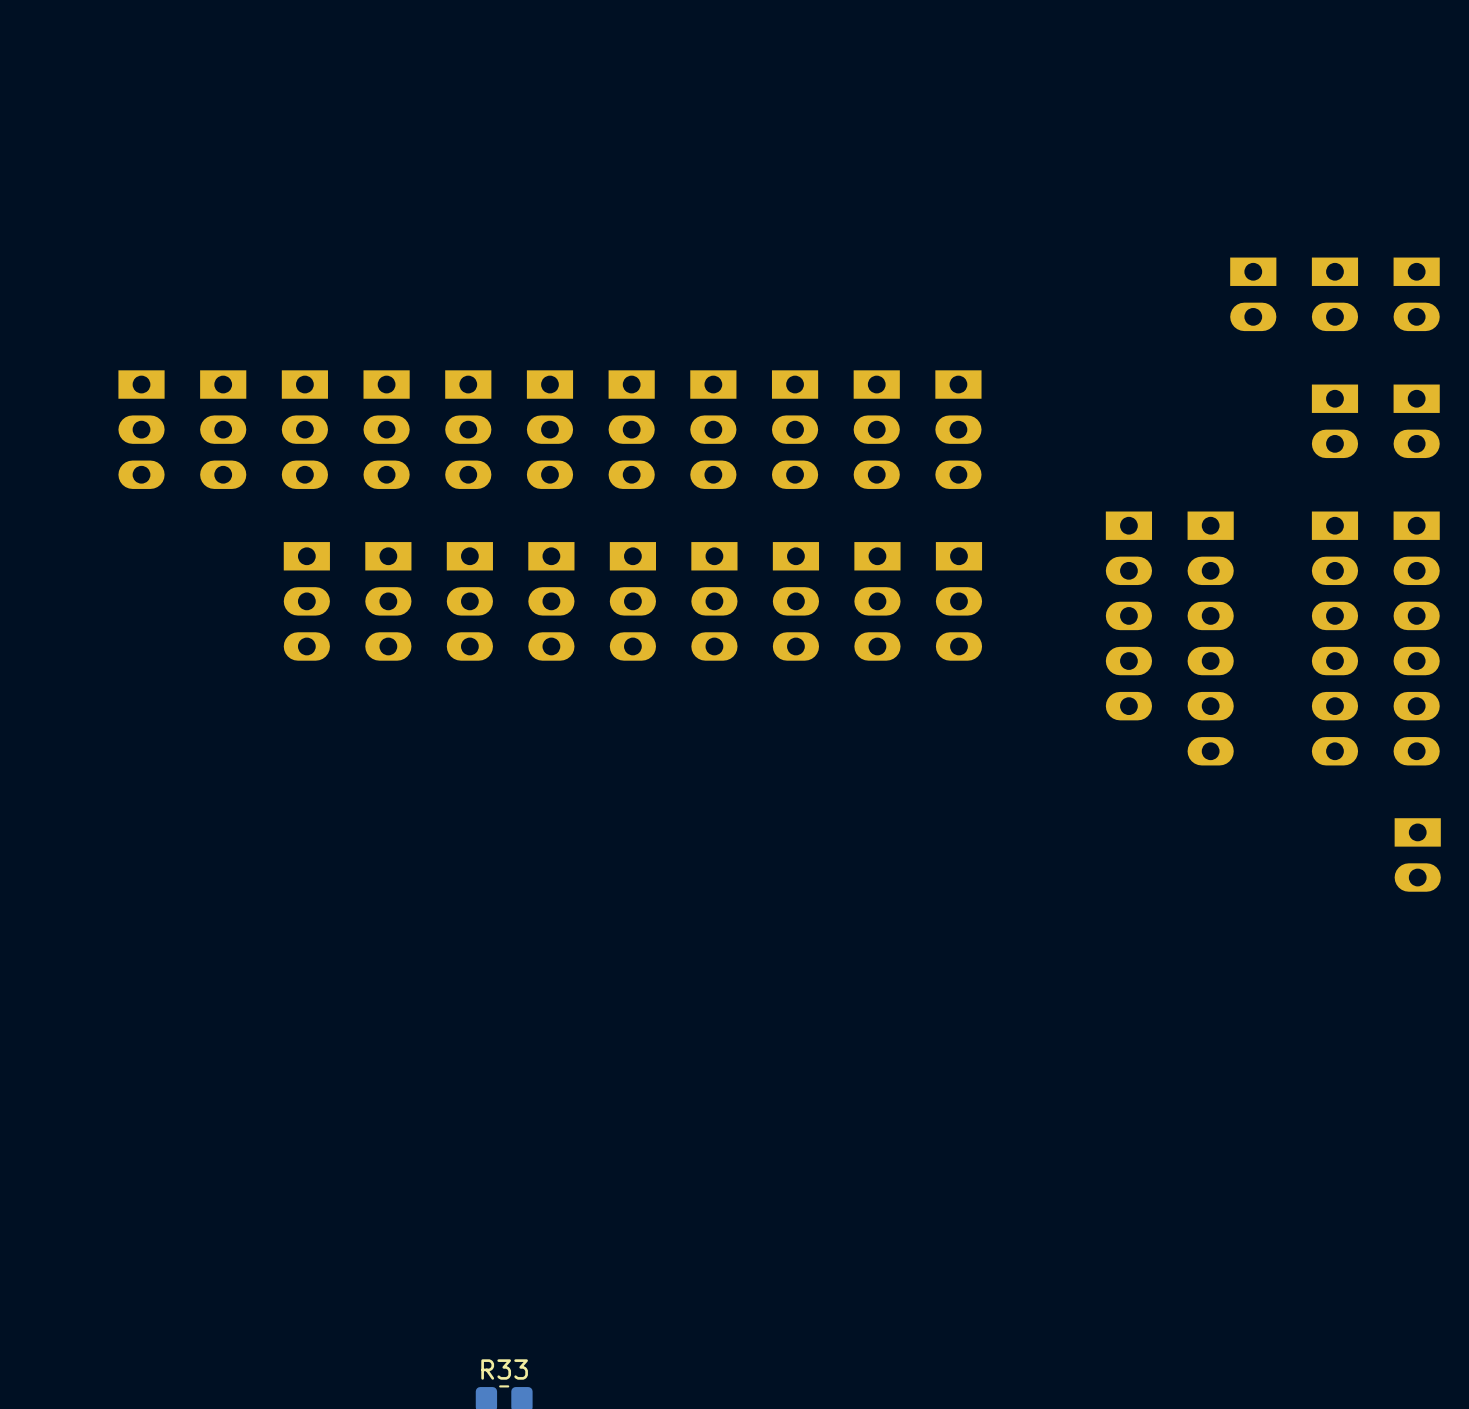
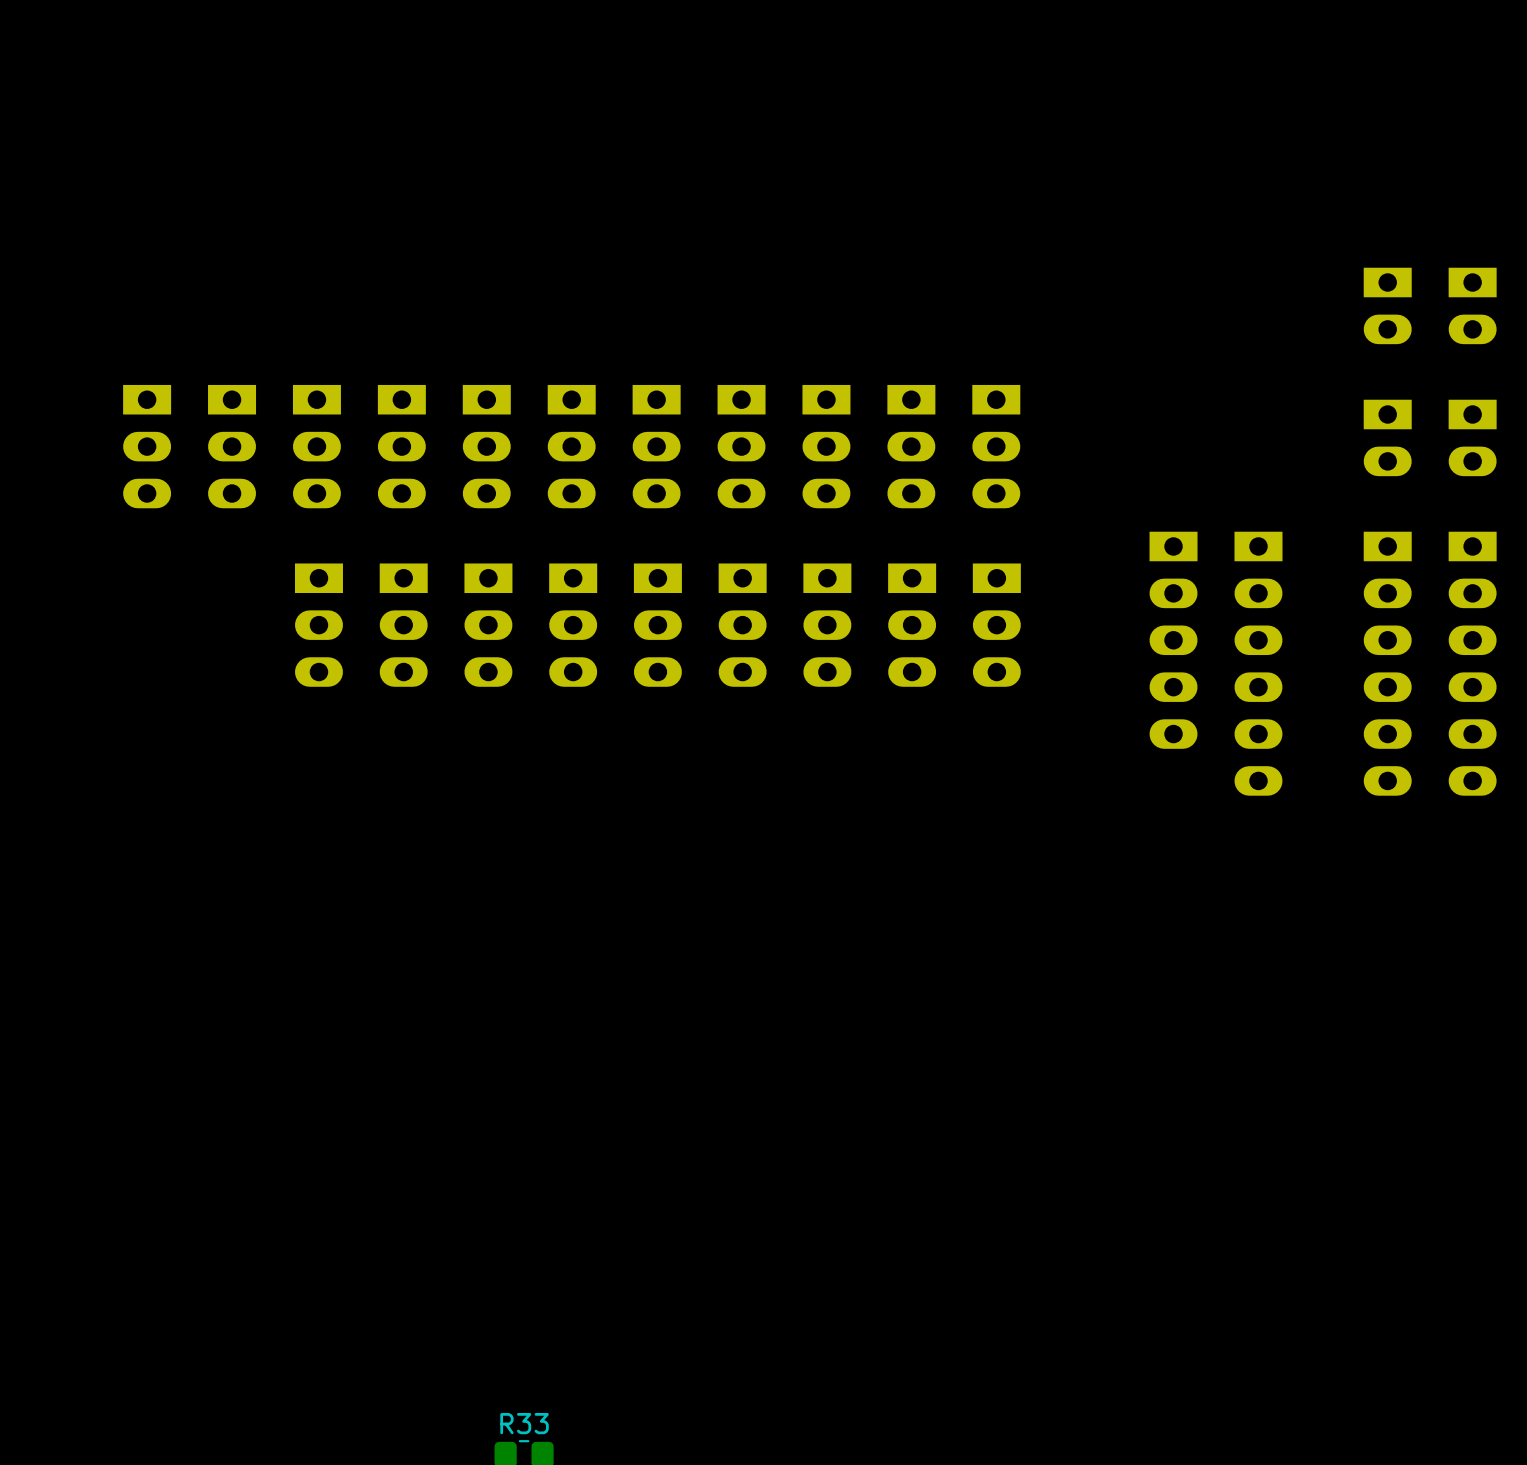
part: (1253, 294) -> none
part: (1417, 854) -> none

